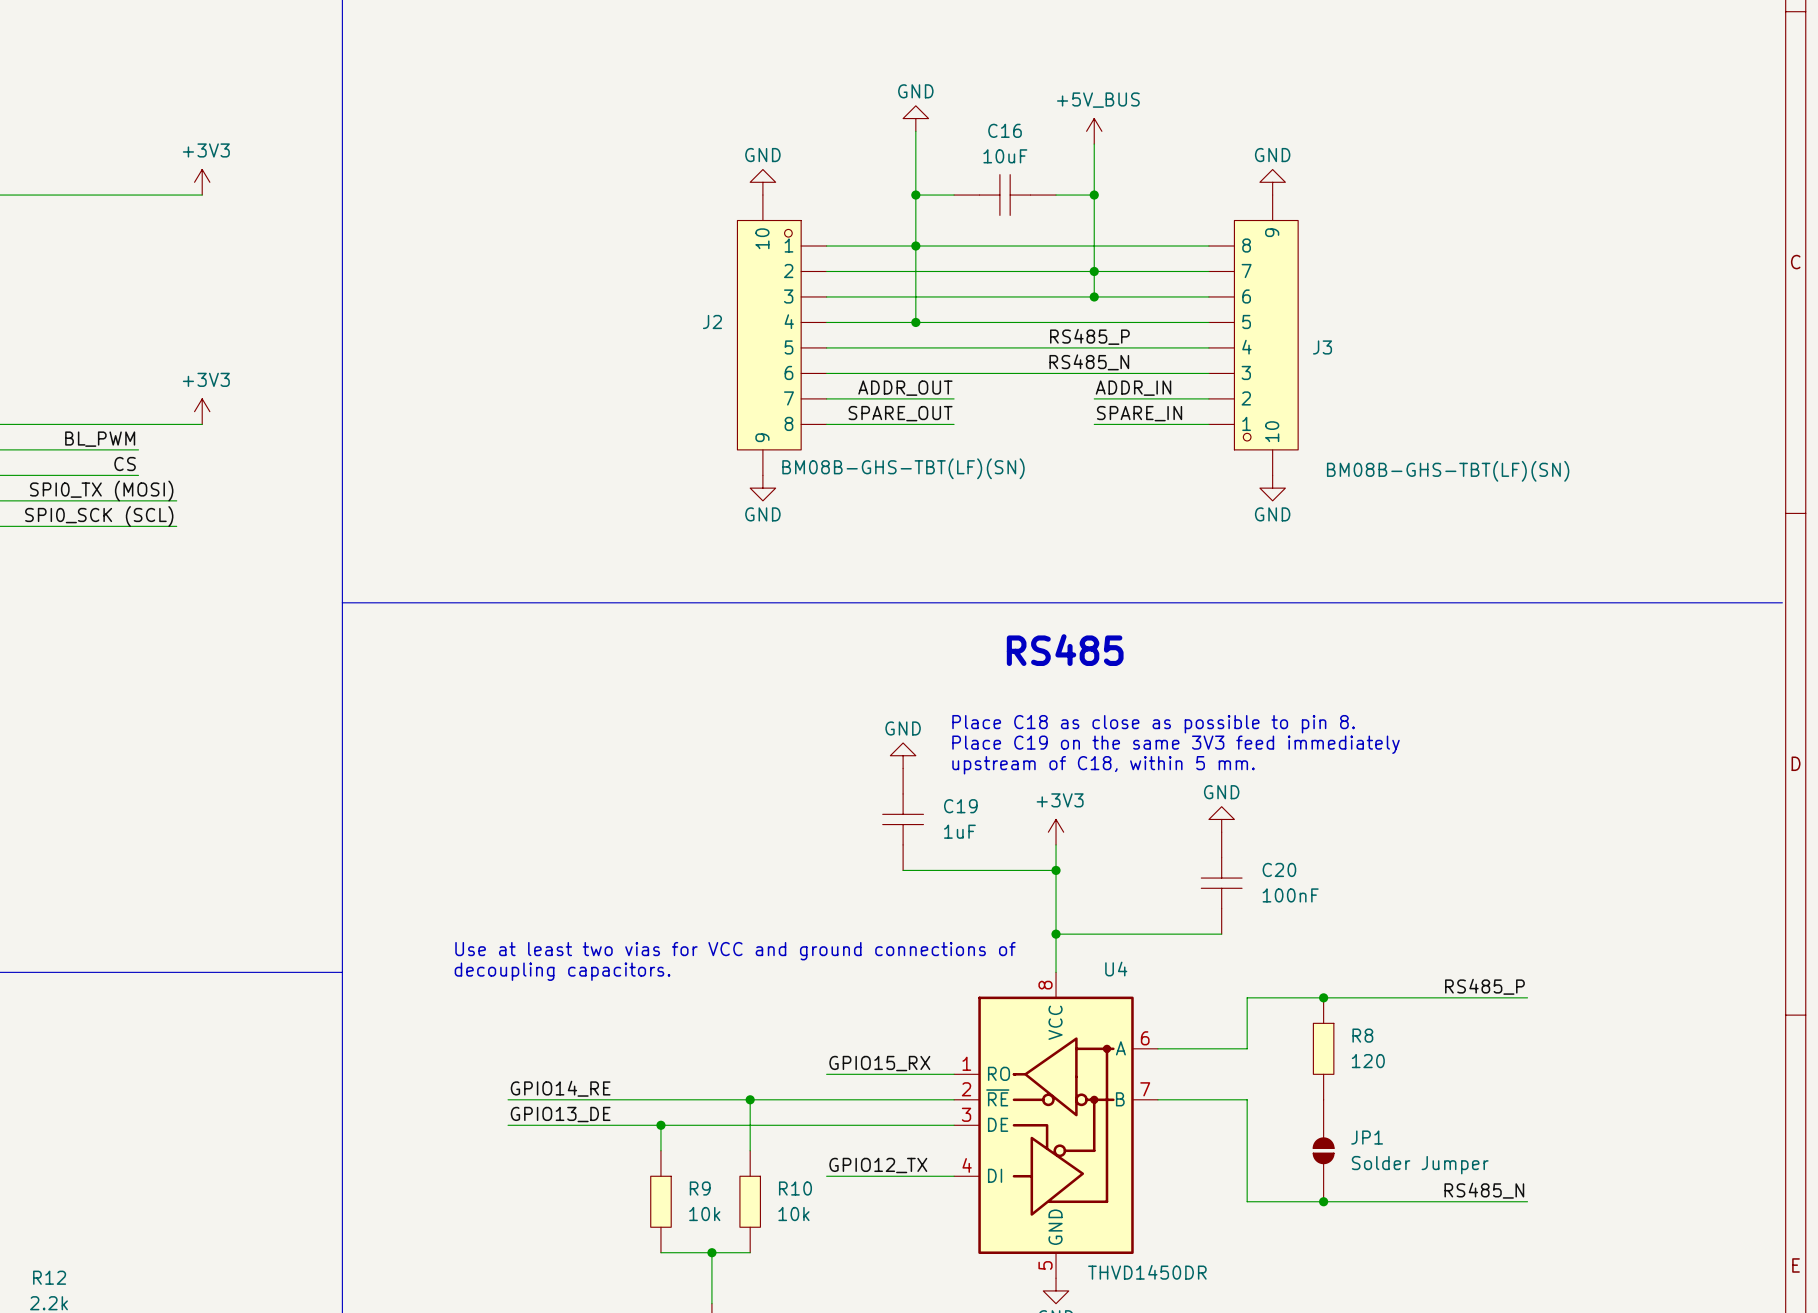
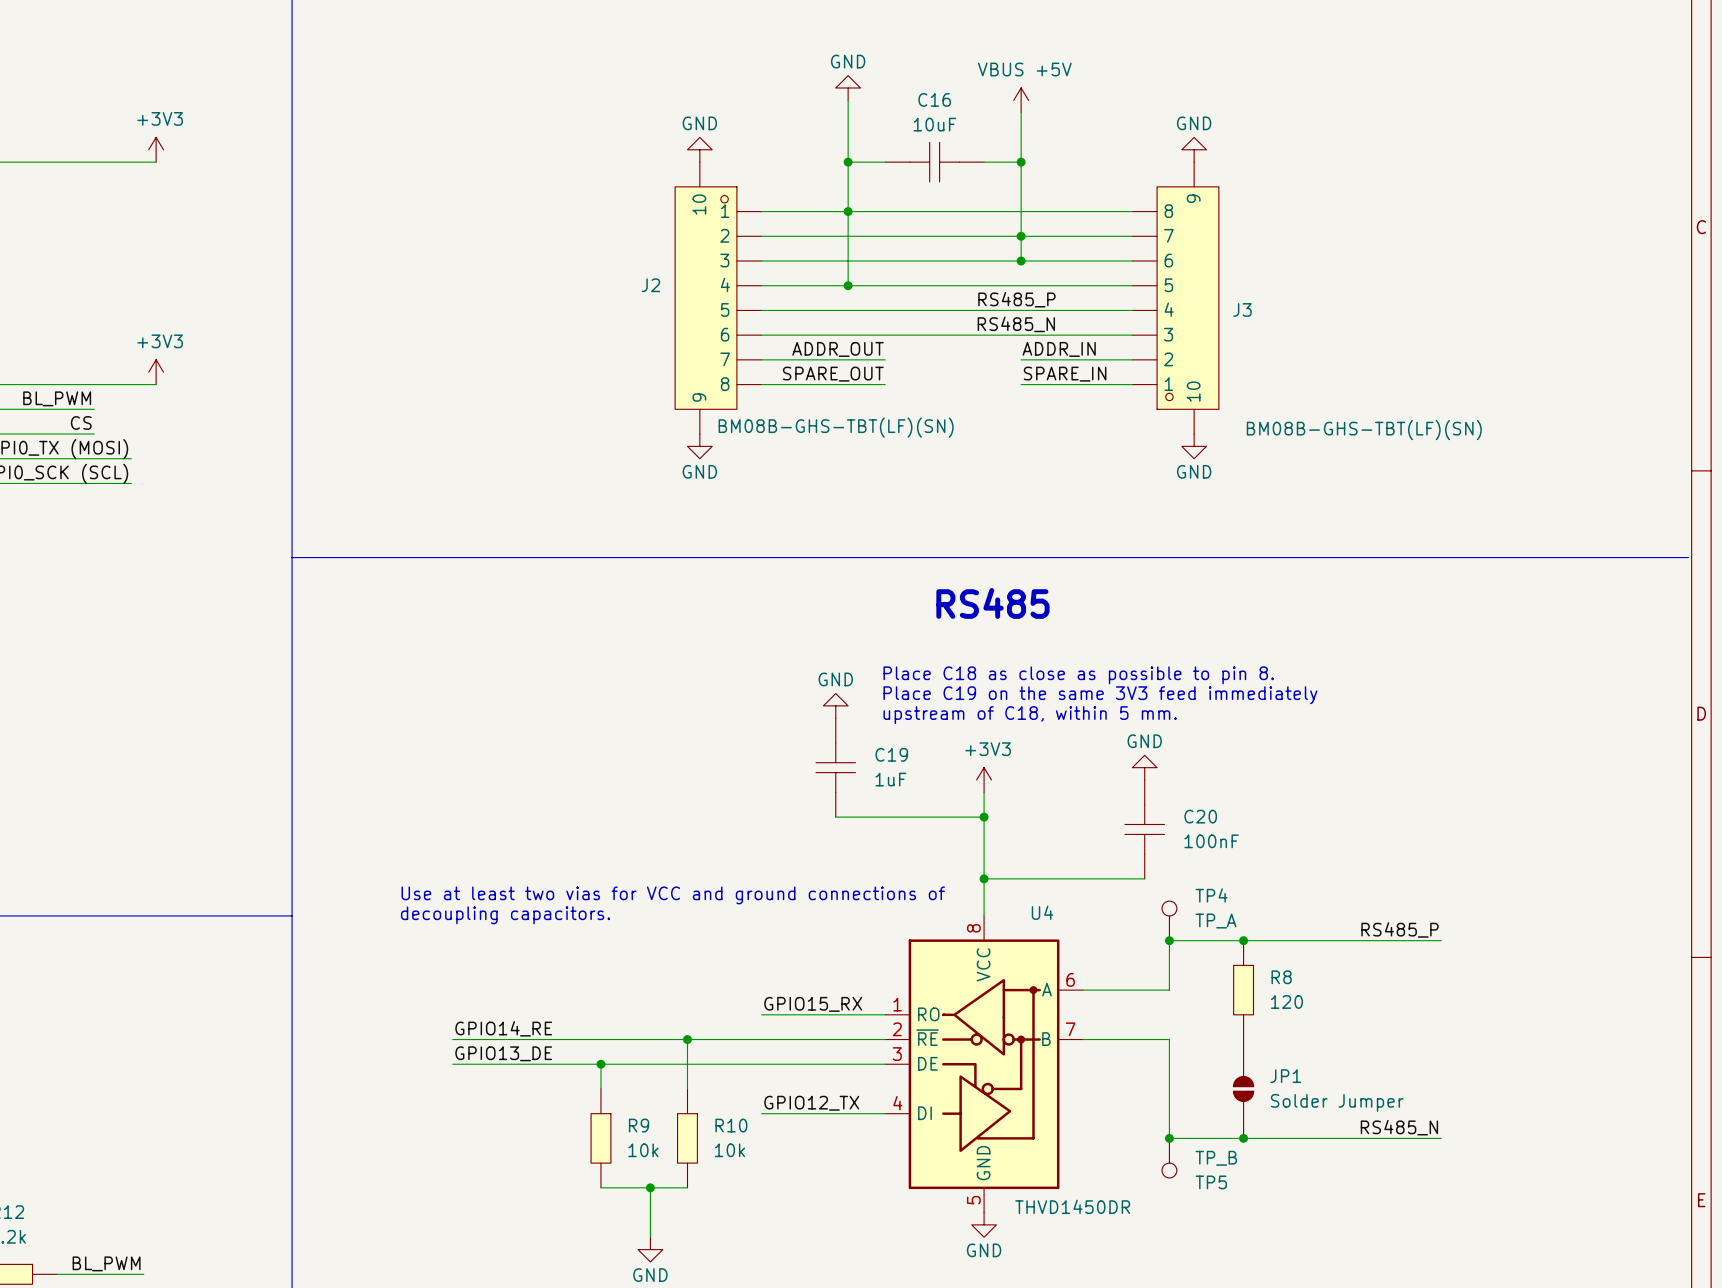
power symbol: +5V_BUS (1094, 131) -> VBUS +5V (1021, 100)
TP4: none -> TP_A (1169, 920)
junction: none -> (1169, 940)
junction: none -> (1169, 1138)
TP5: none -> TP_B (1169, 1158)

